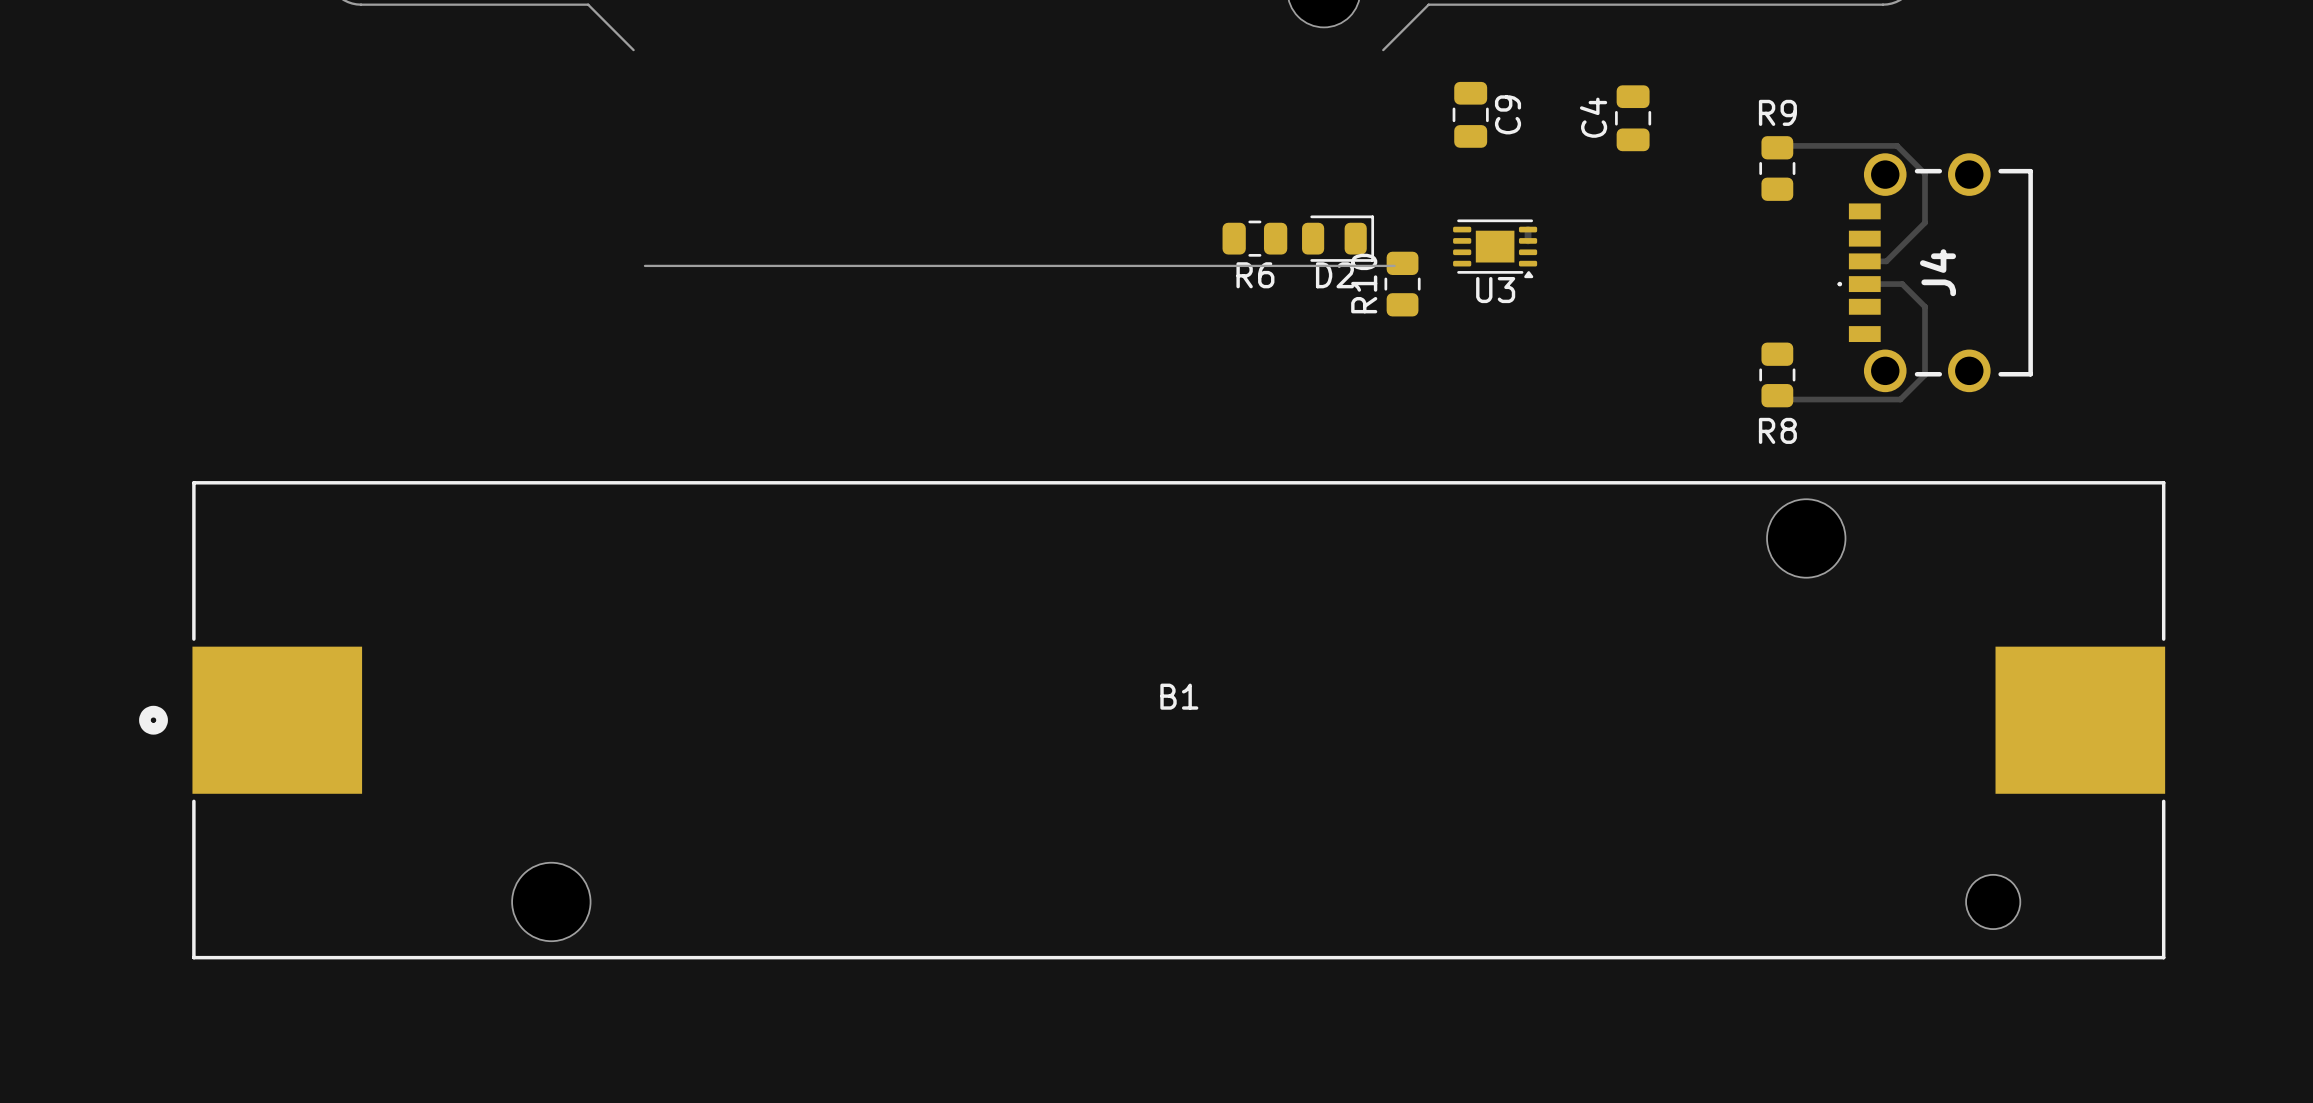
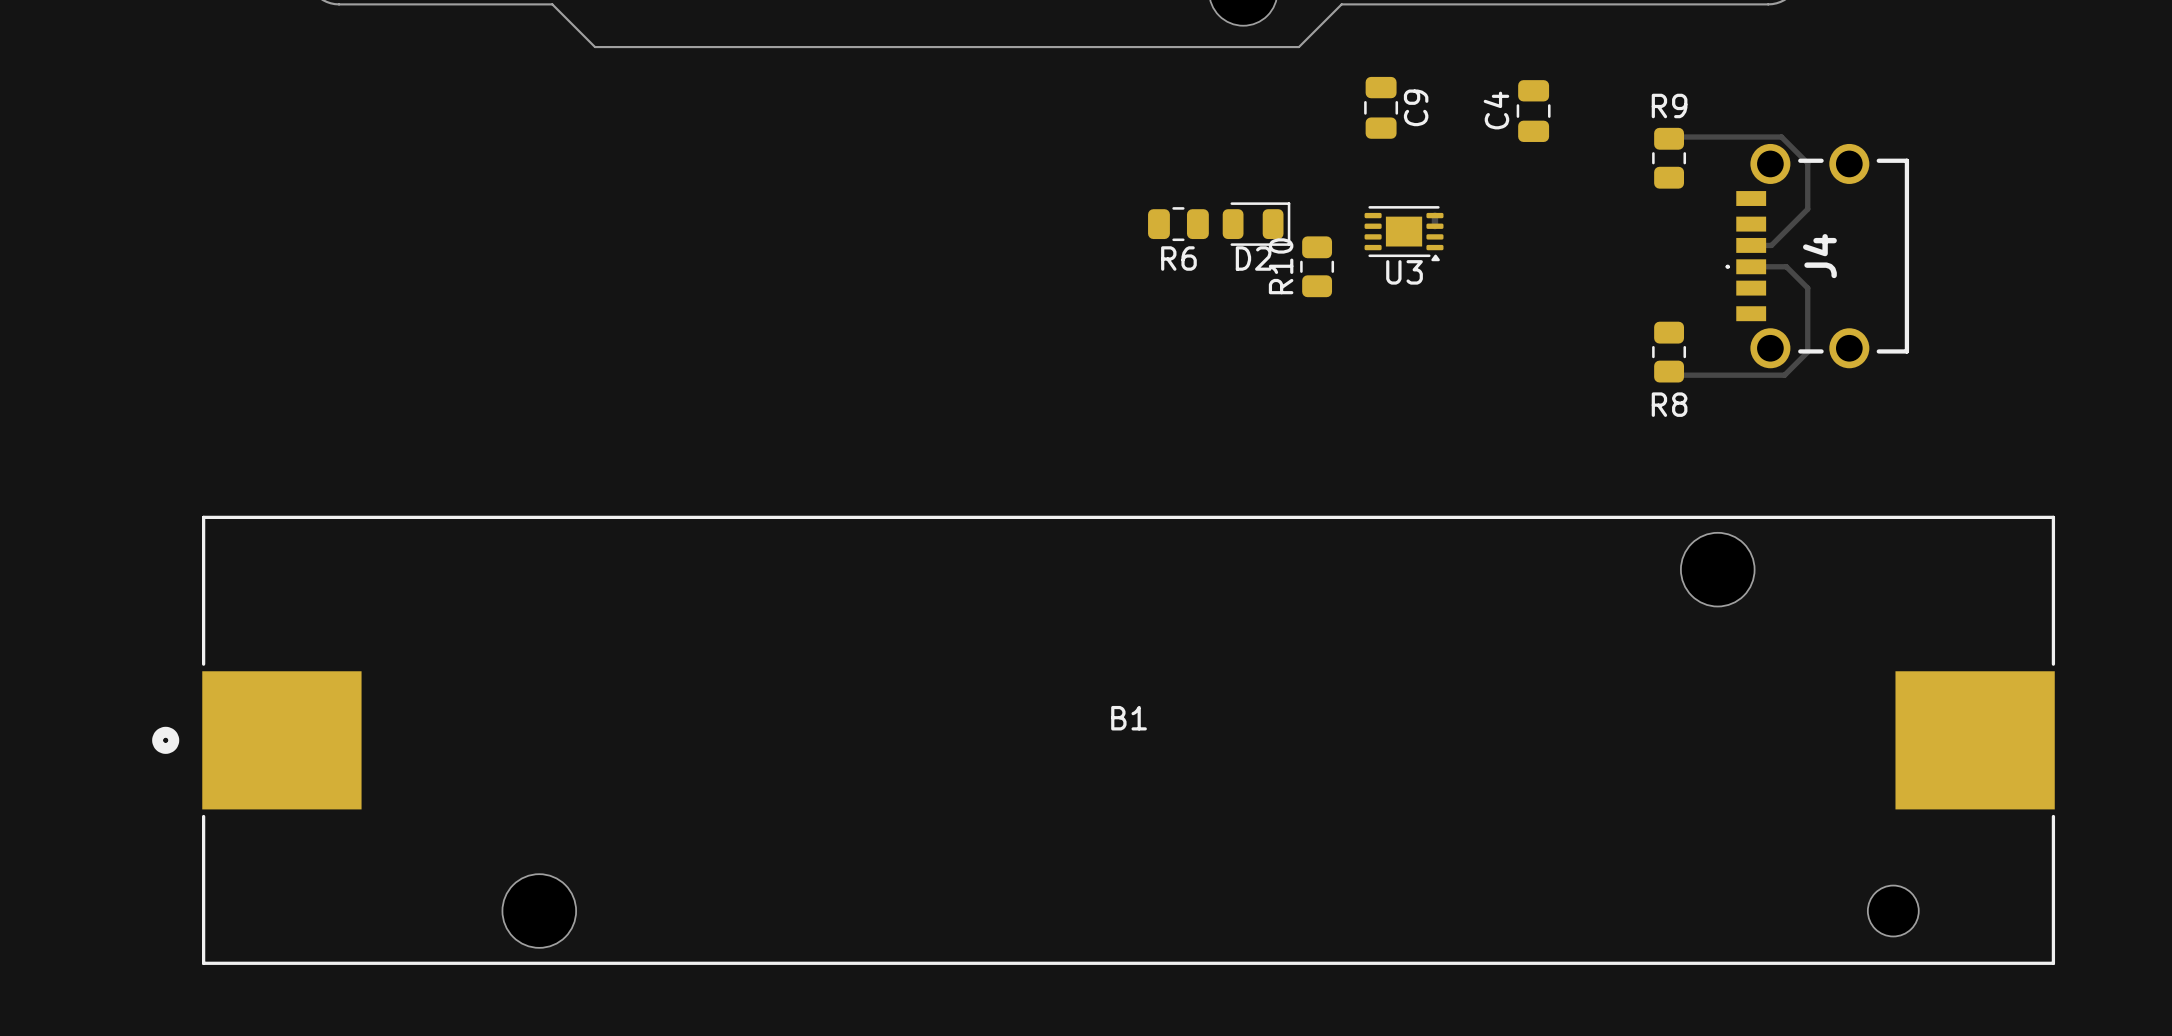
board edge: (644, 265) (1394, 265) -> (595, 47) (1298, 47)
B1 position: (1152, 720) -> (1103, 740)

